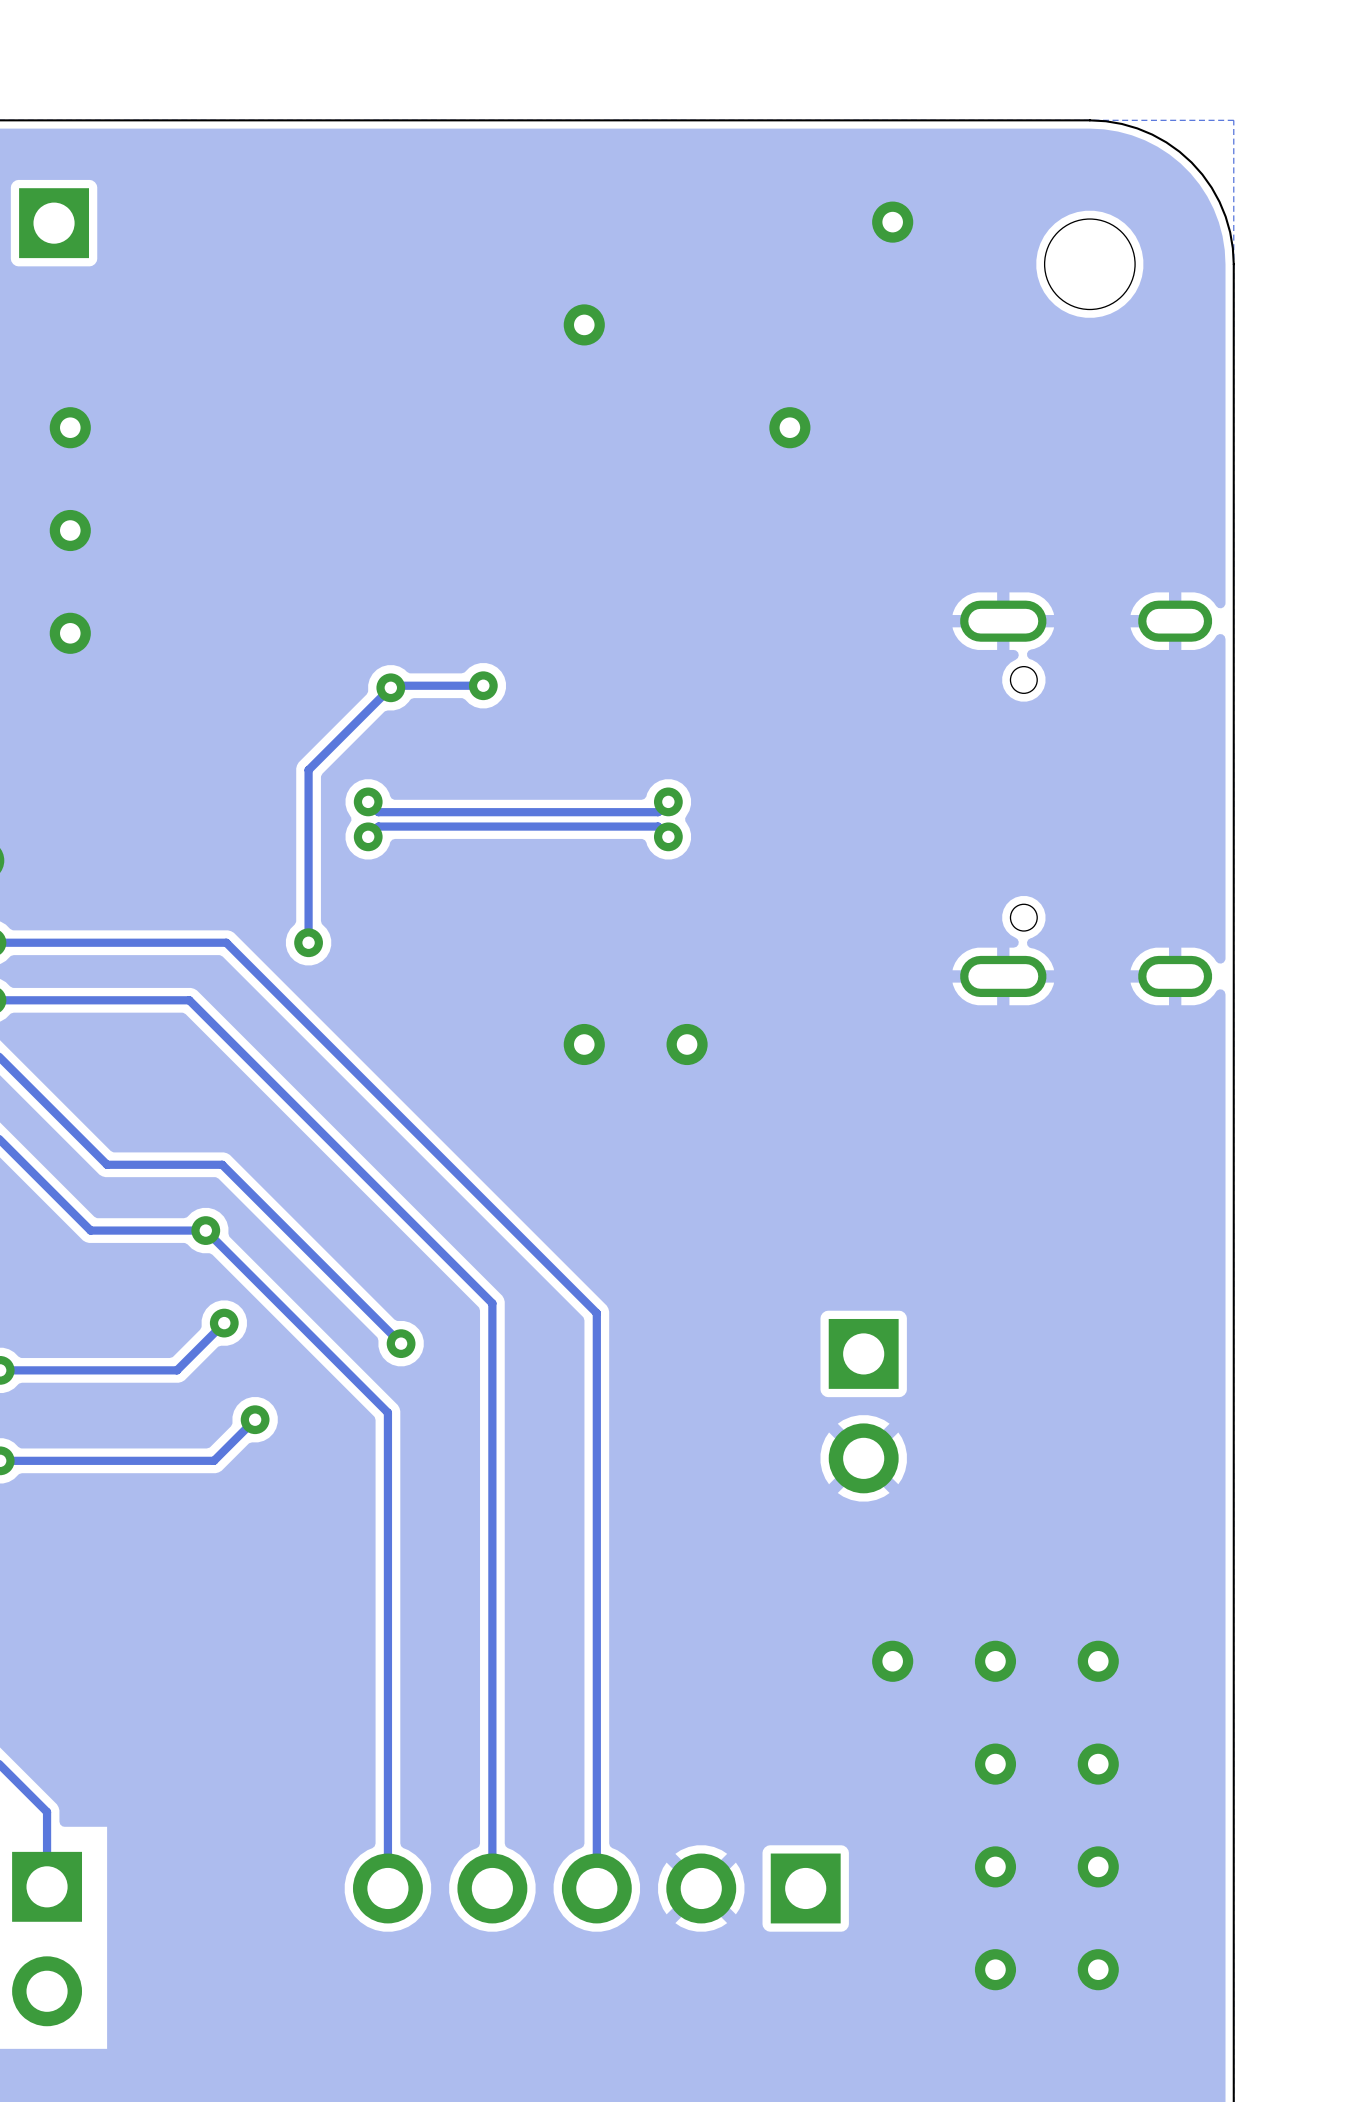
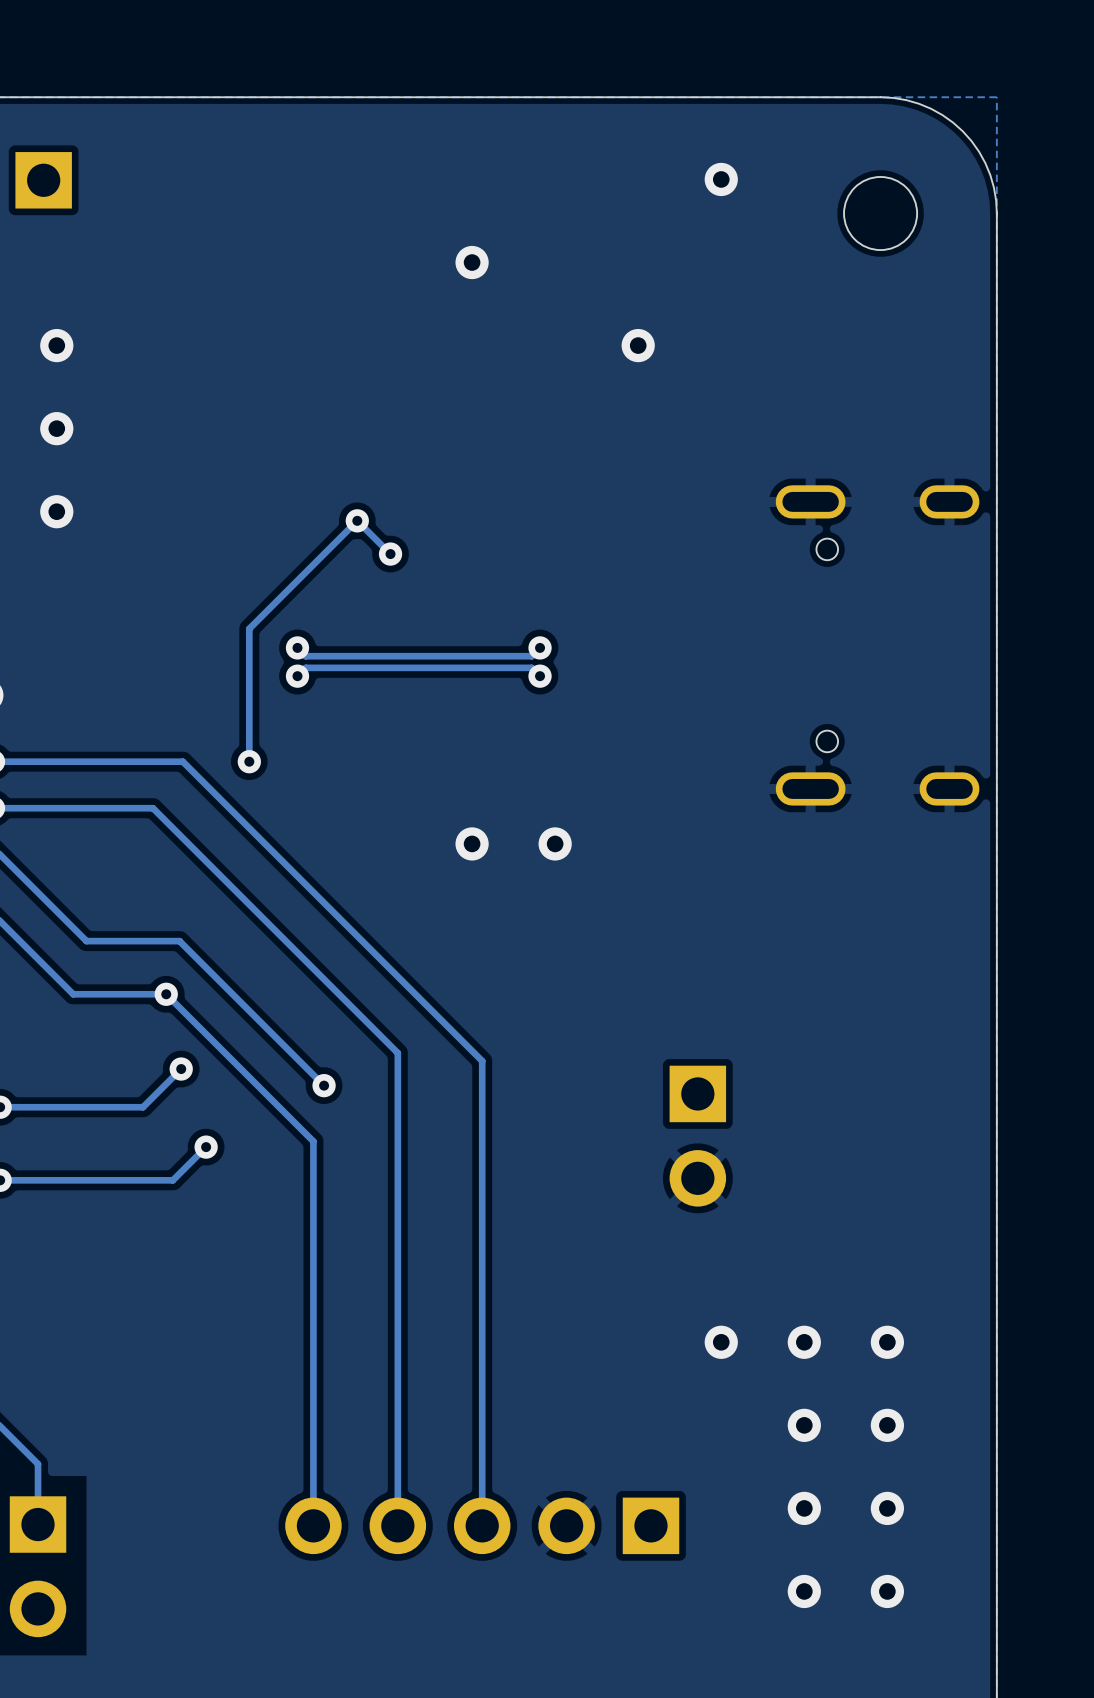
track: (483, 685) (392, 685) (308, 770) (308, 778) -> (390, 554) (357, 520) (249, 628)
via position: (390, 687) -> (357, 520)

